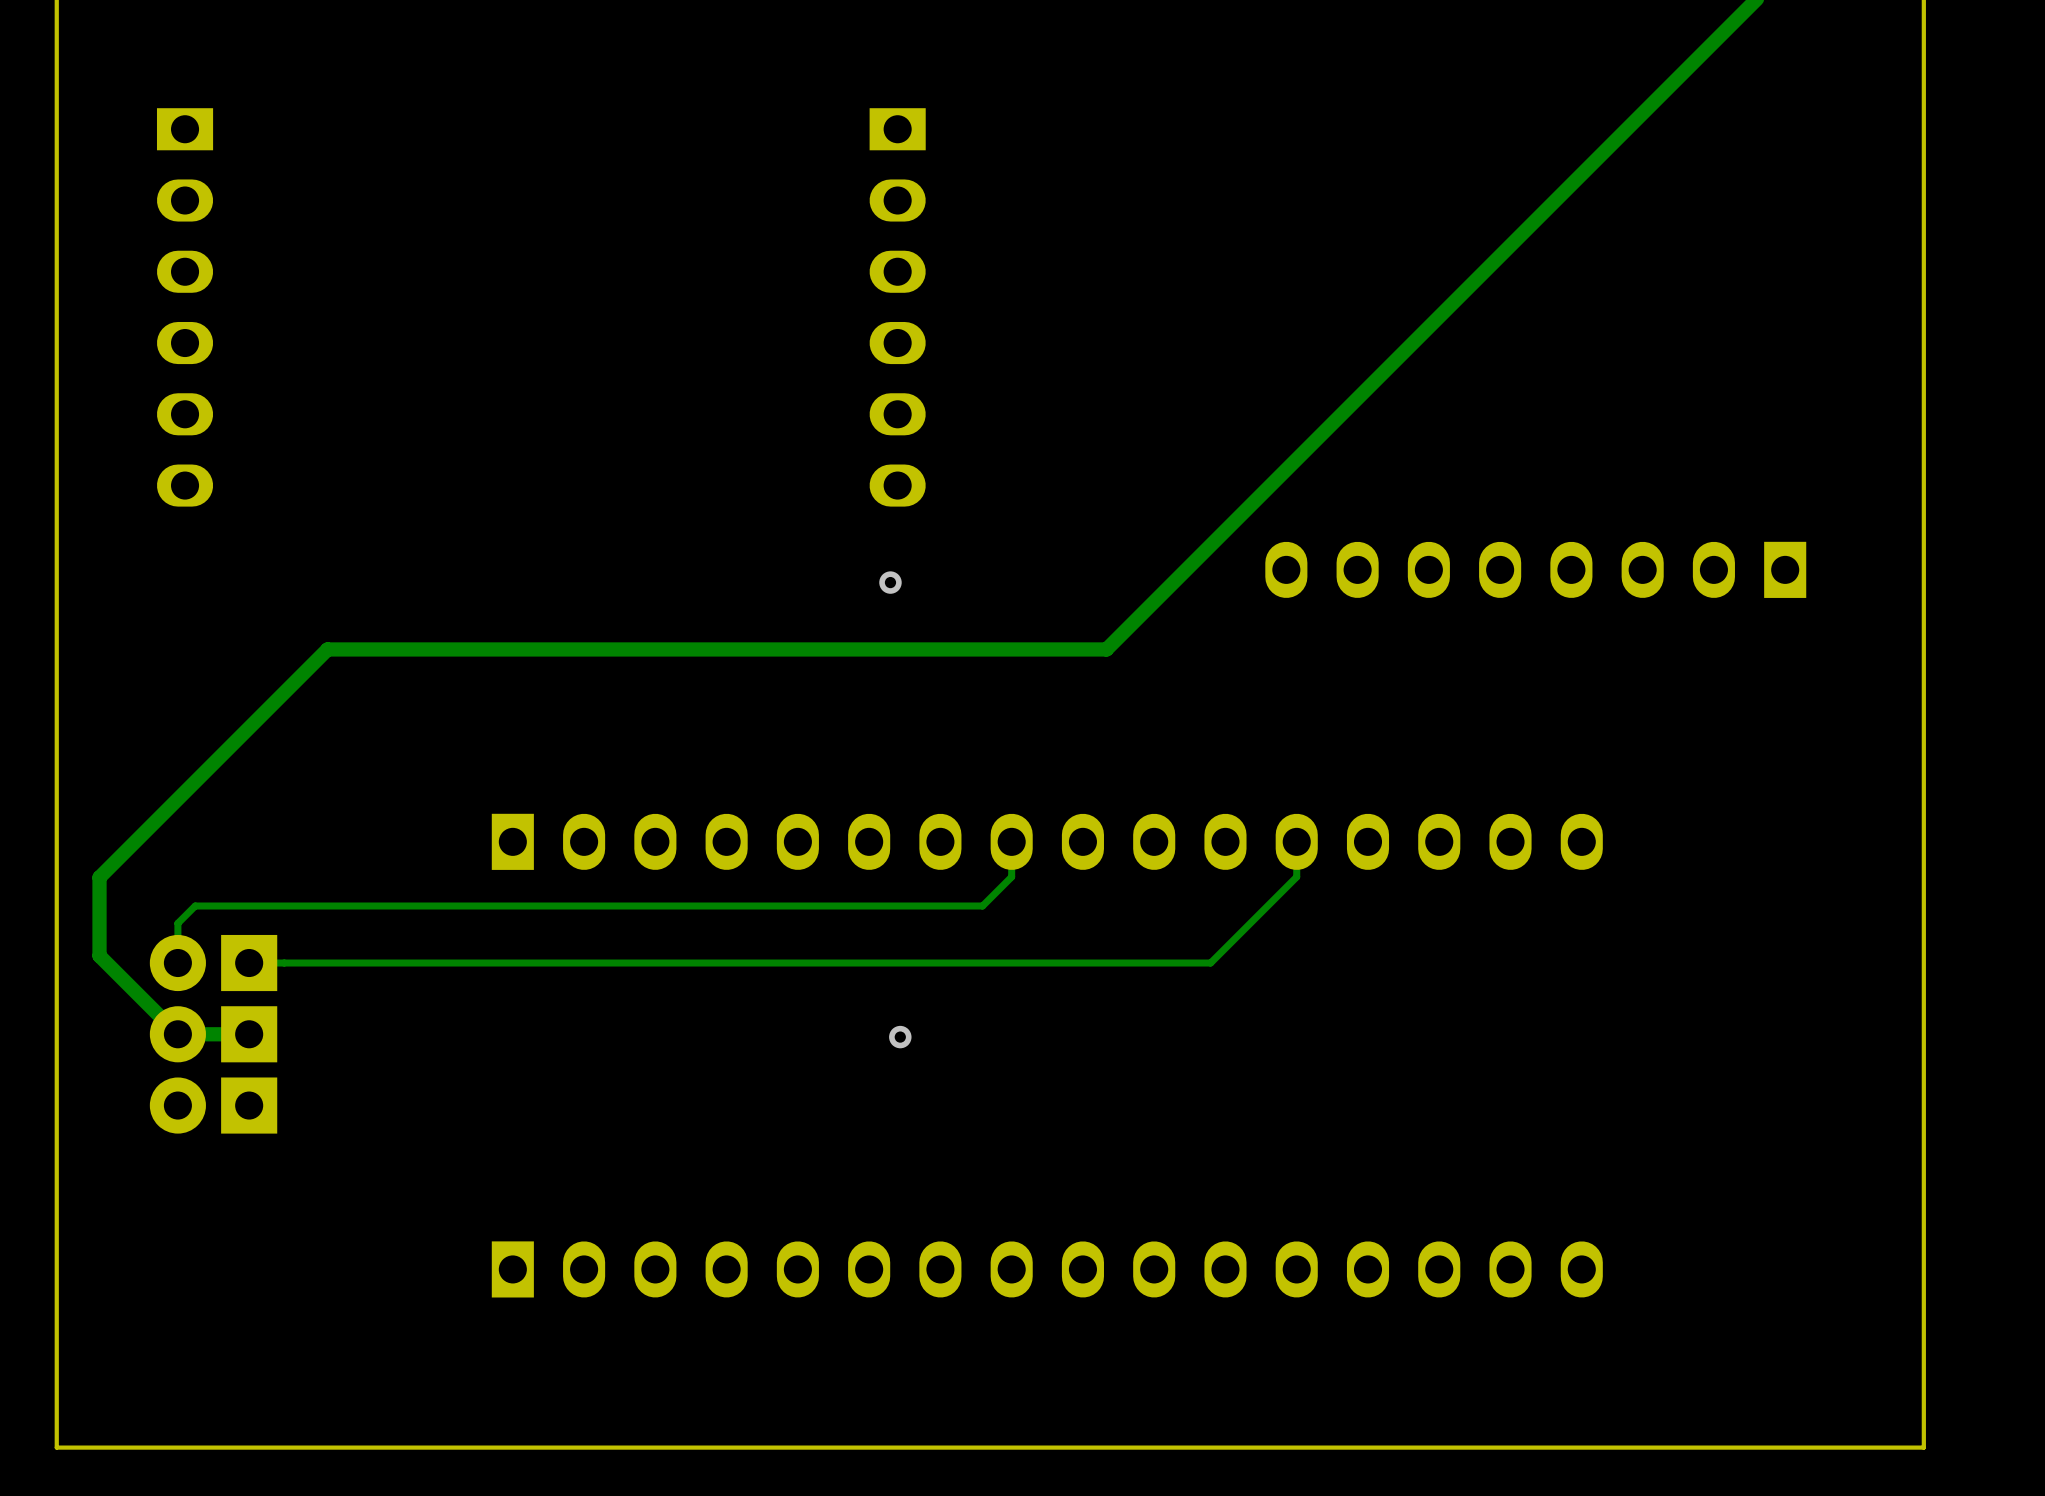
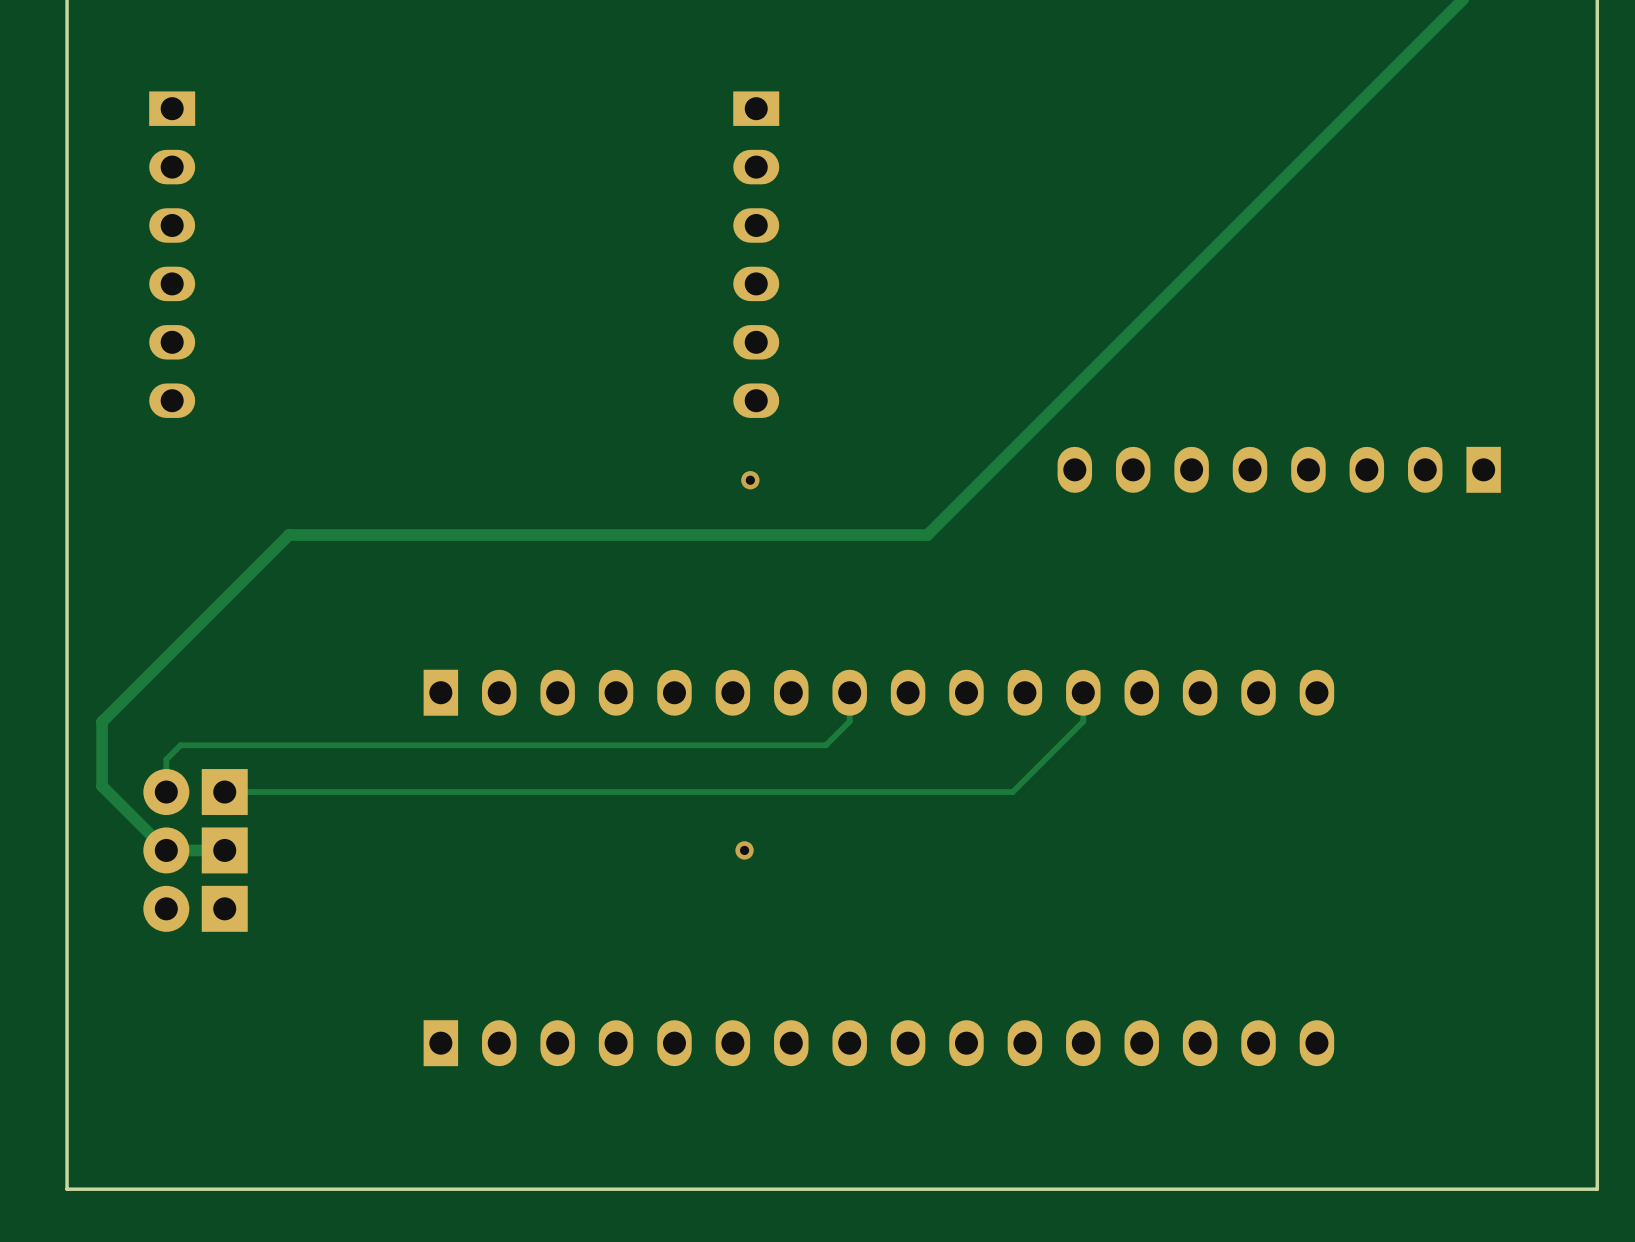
via position: (900, 1037) -> (744, 850)

